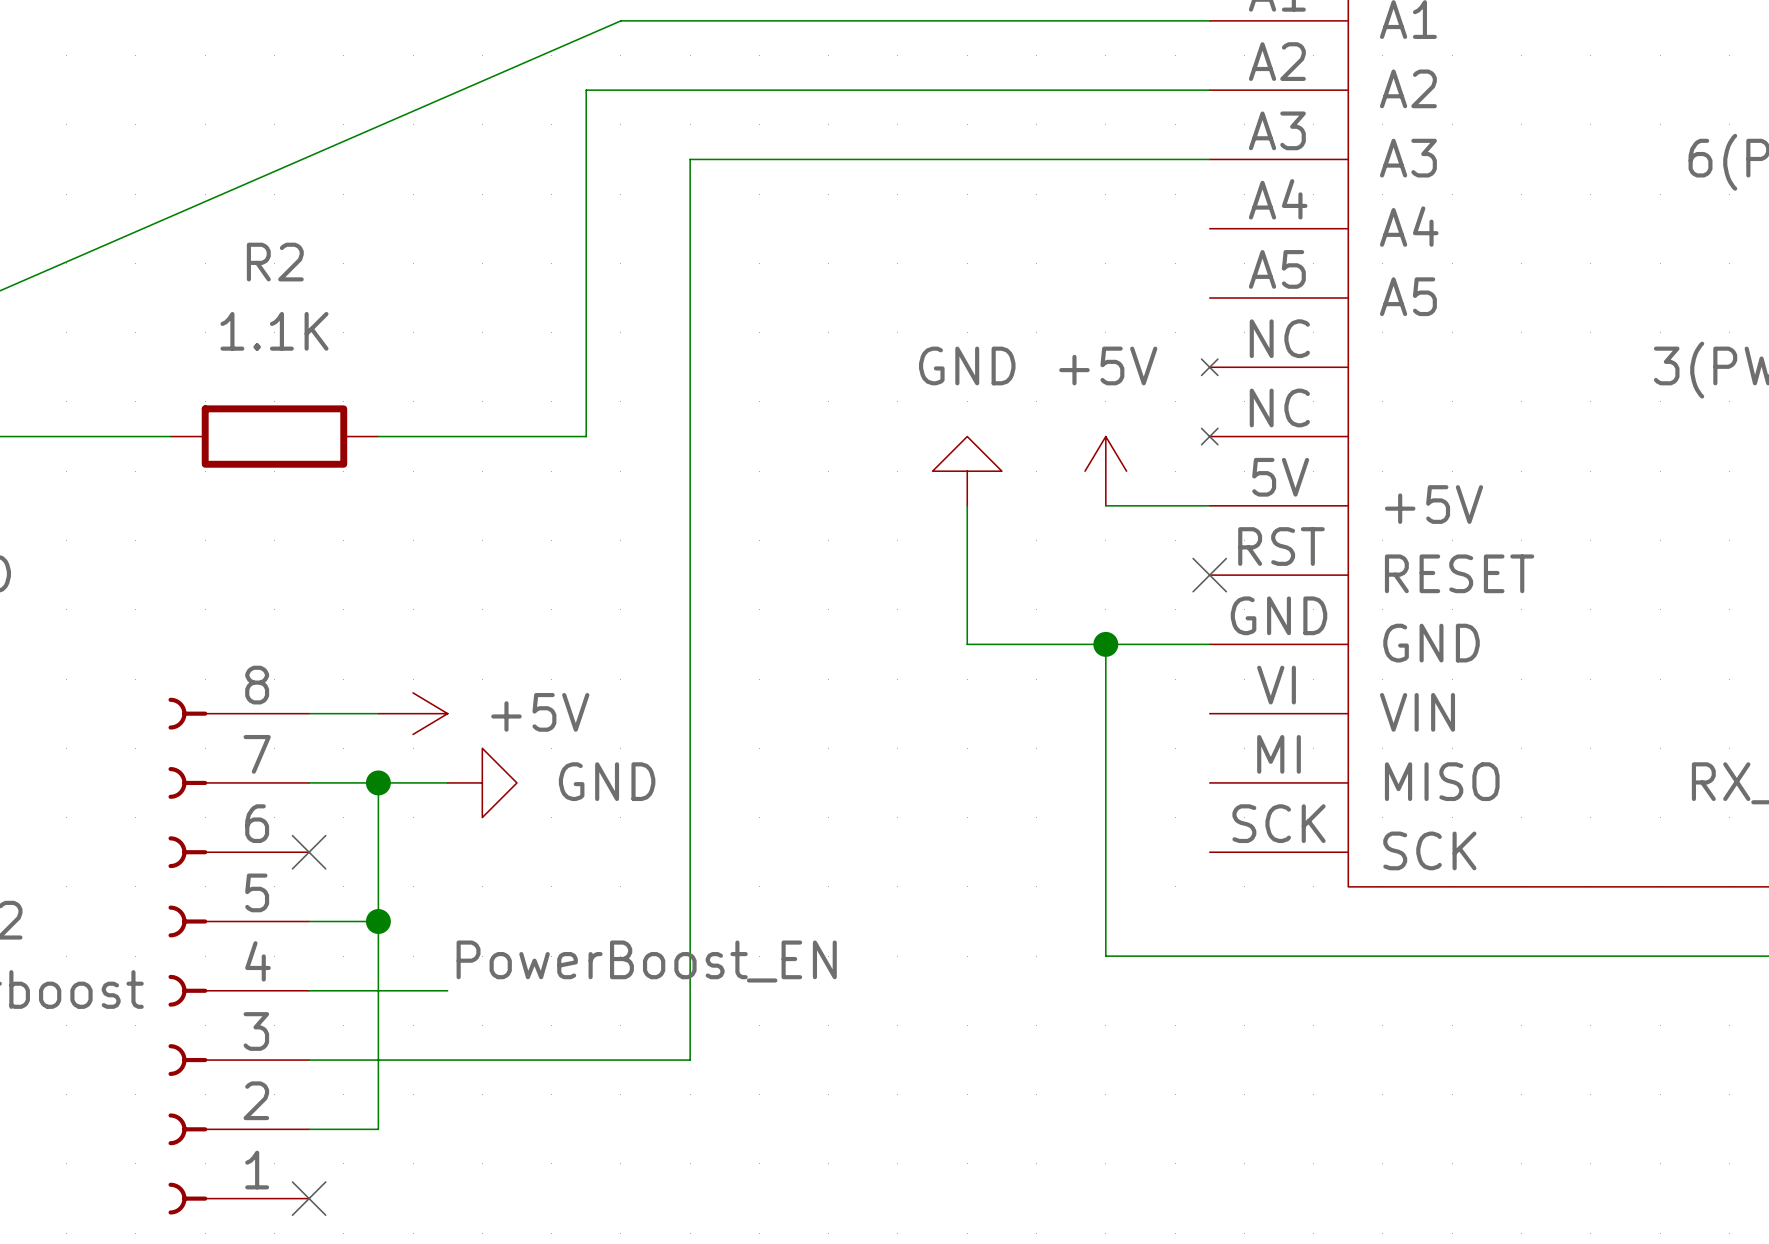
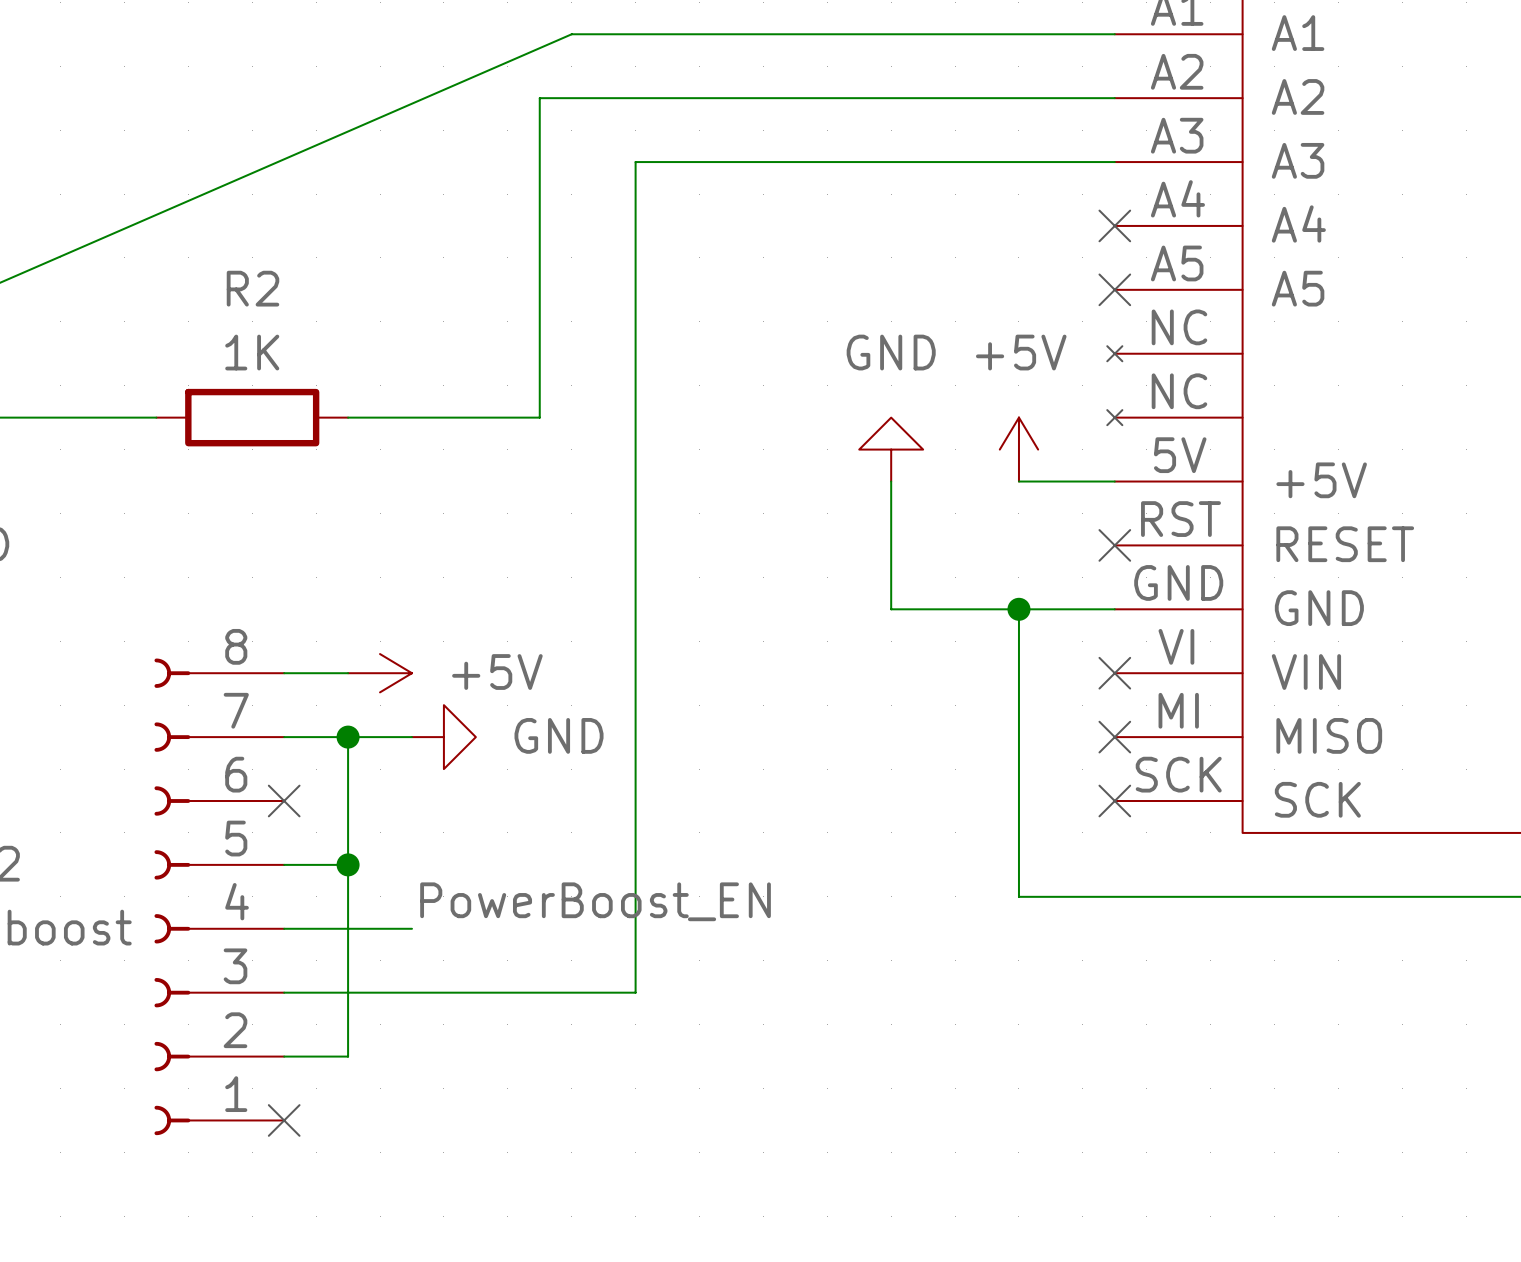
no-connect mark: none -> (1114, 225)
R2 name position: R2 (275, 262) -> R2 (253, 288)
no-connect mark: none -> (1114, 289)
R2 value: 1.1K (274, 331) -> 1K (252, 352)
no-connect mark: none -> (1114, 673)
no-connect mark: none -> (1114, 737)
no-connect mark: none -> (1114, 800)

